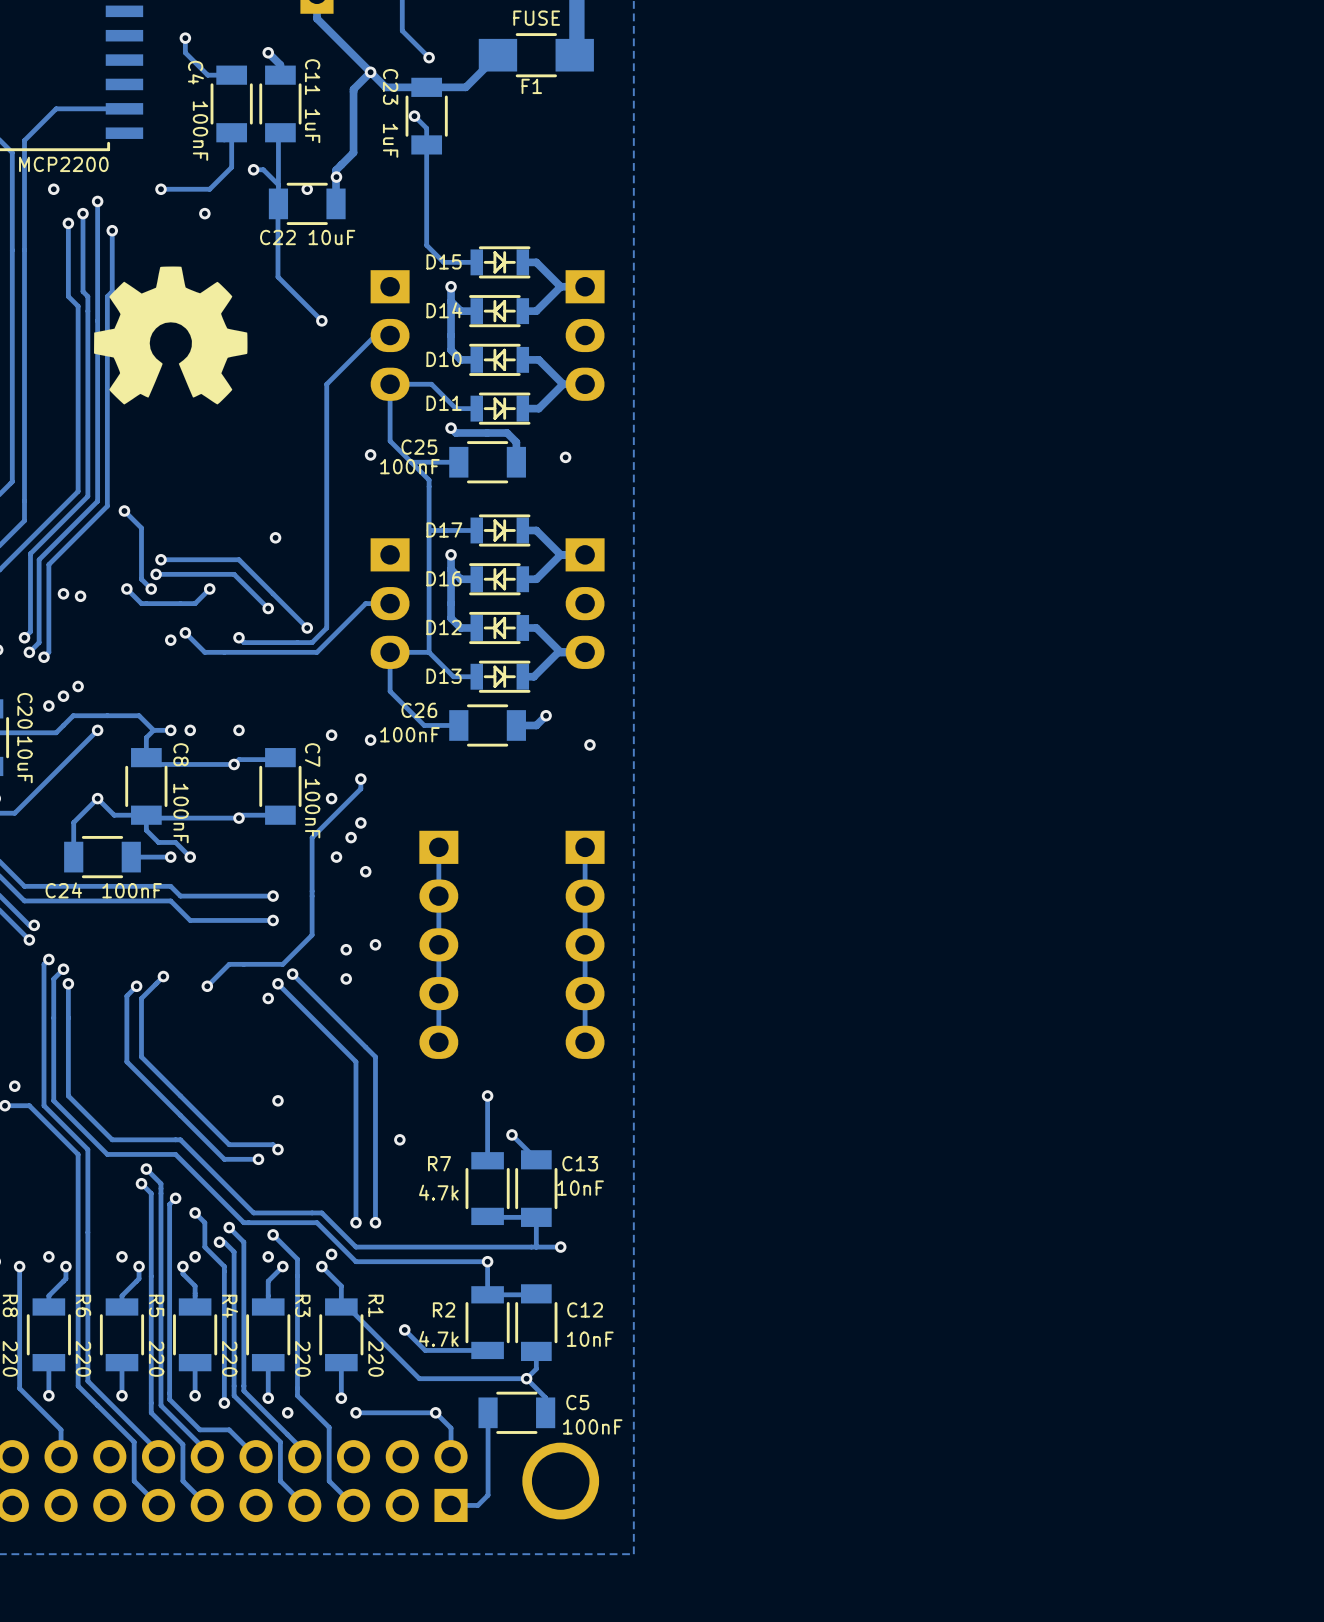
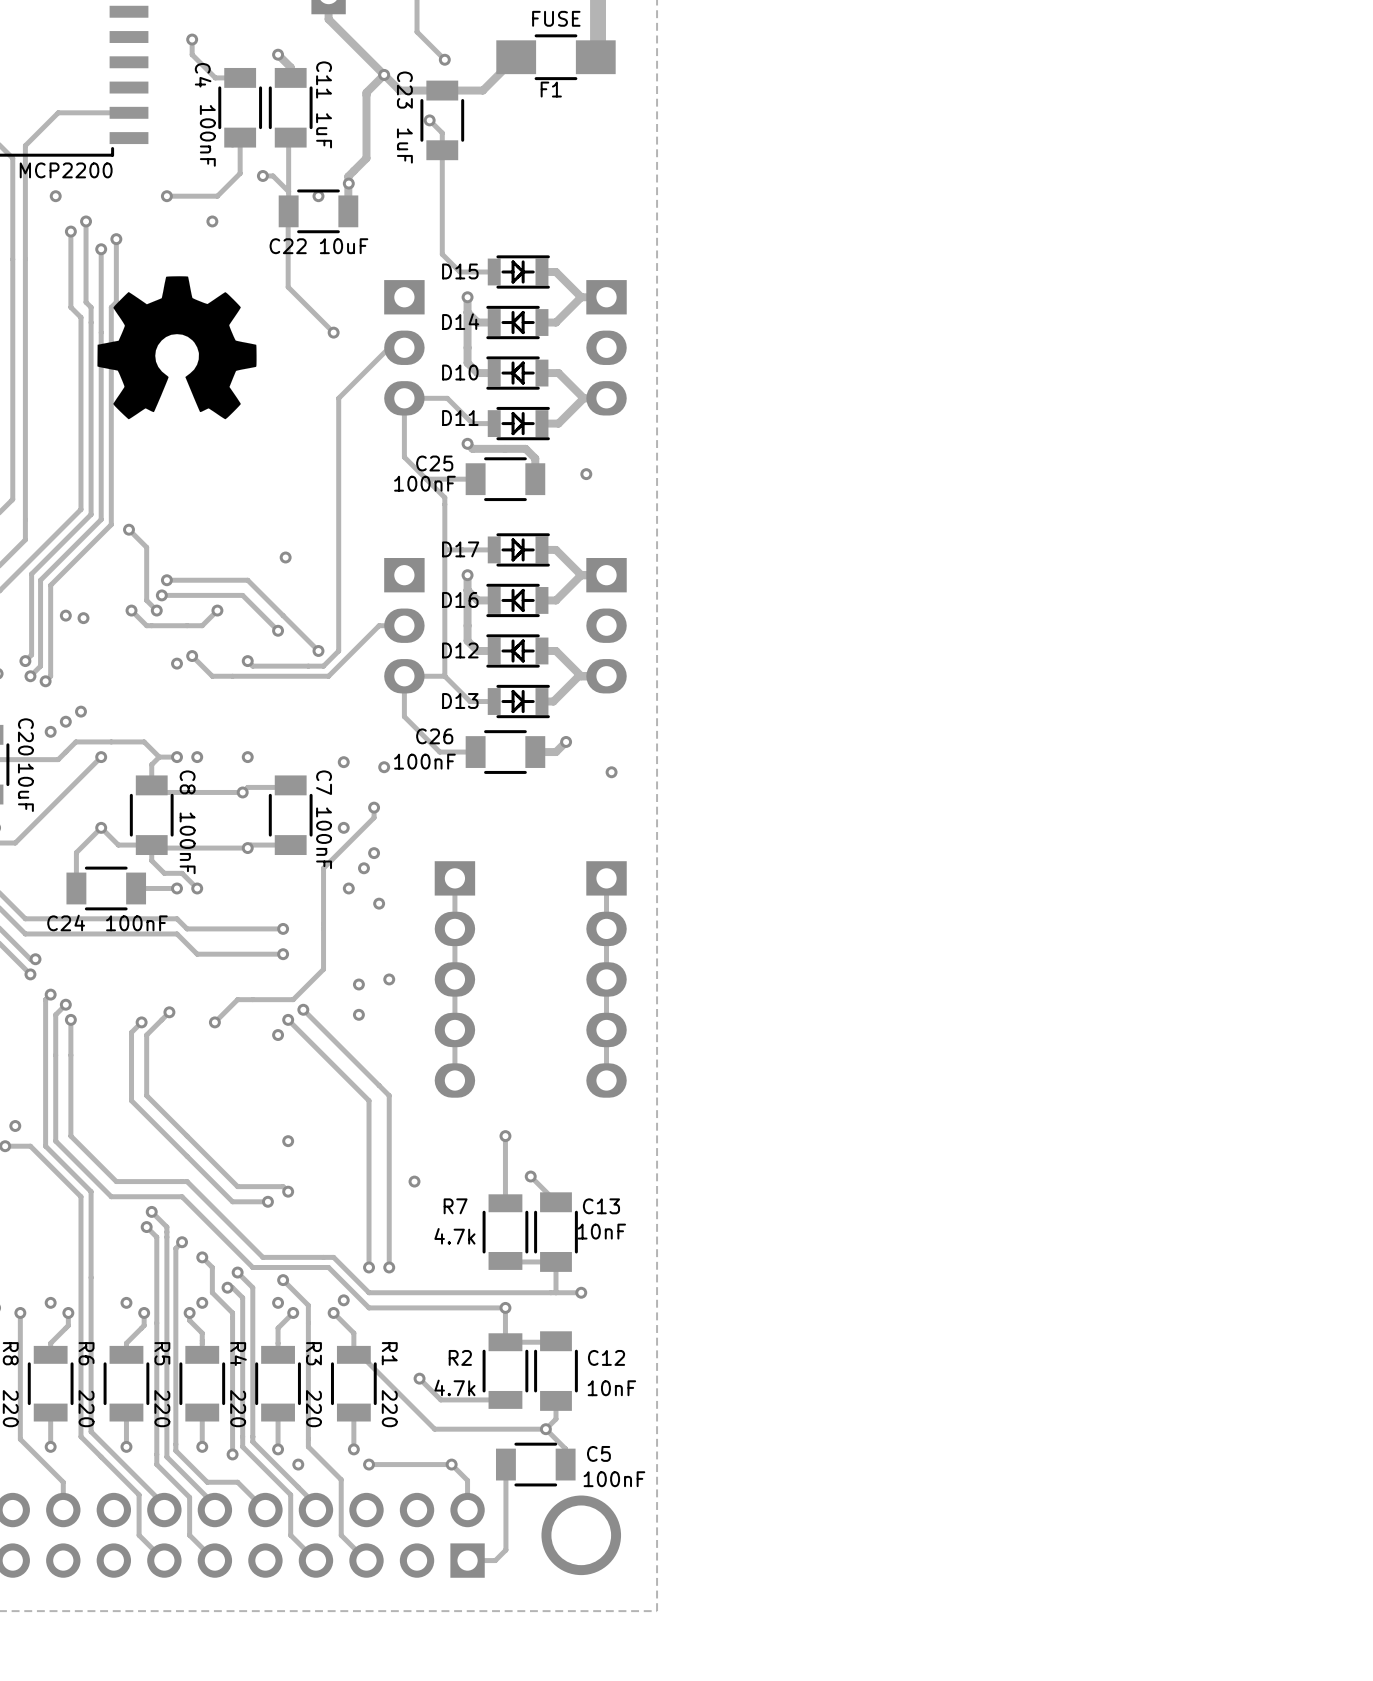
track: (97, 201) (97, 240) -> none
via position: (97, 201) -> (101, 249)
via: (370, 454) -> none

